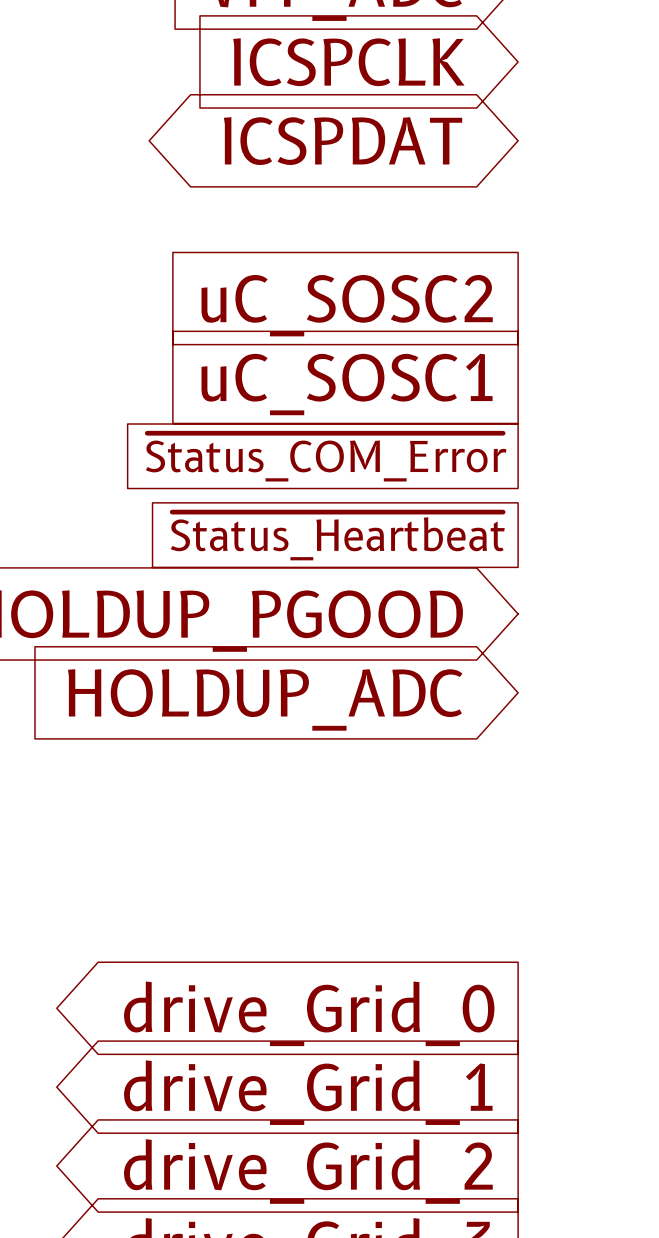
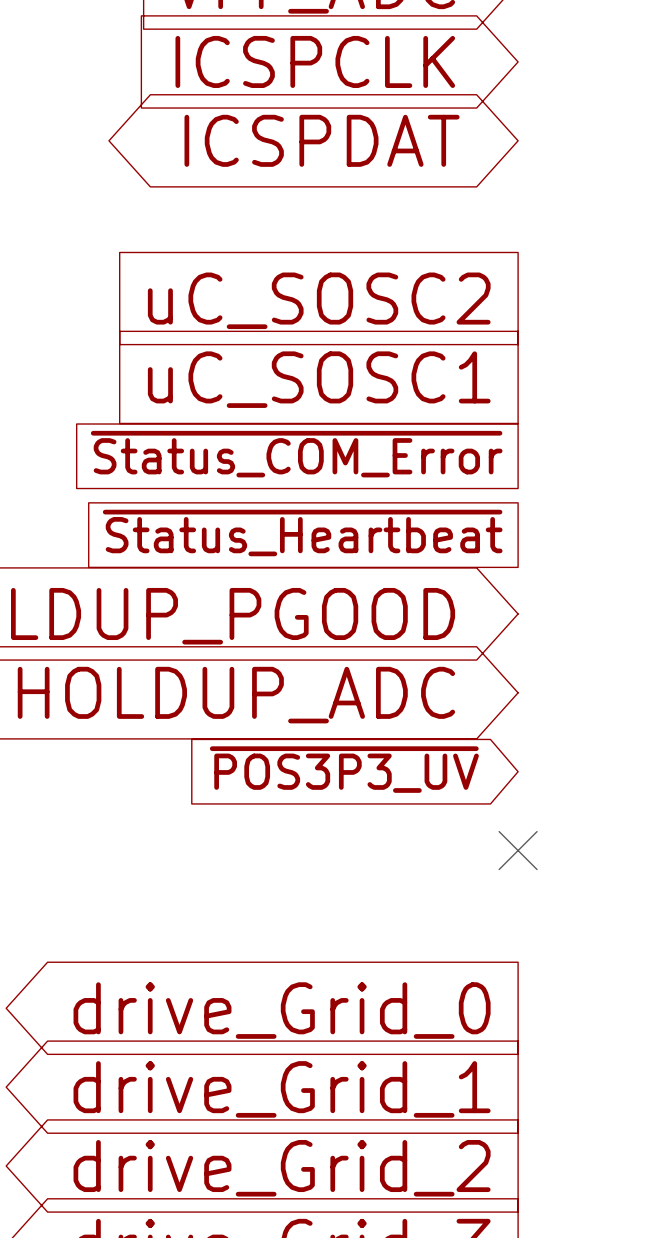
global label: none -> ~{POS3P3_UV} (344, 769)
no-connect mark: none -> (518, 850)

